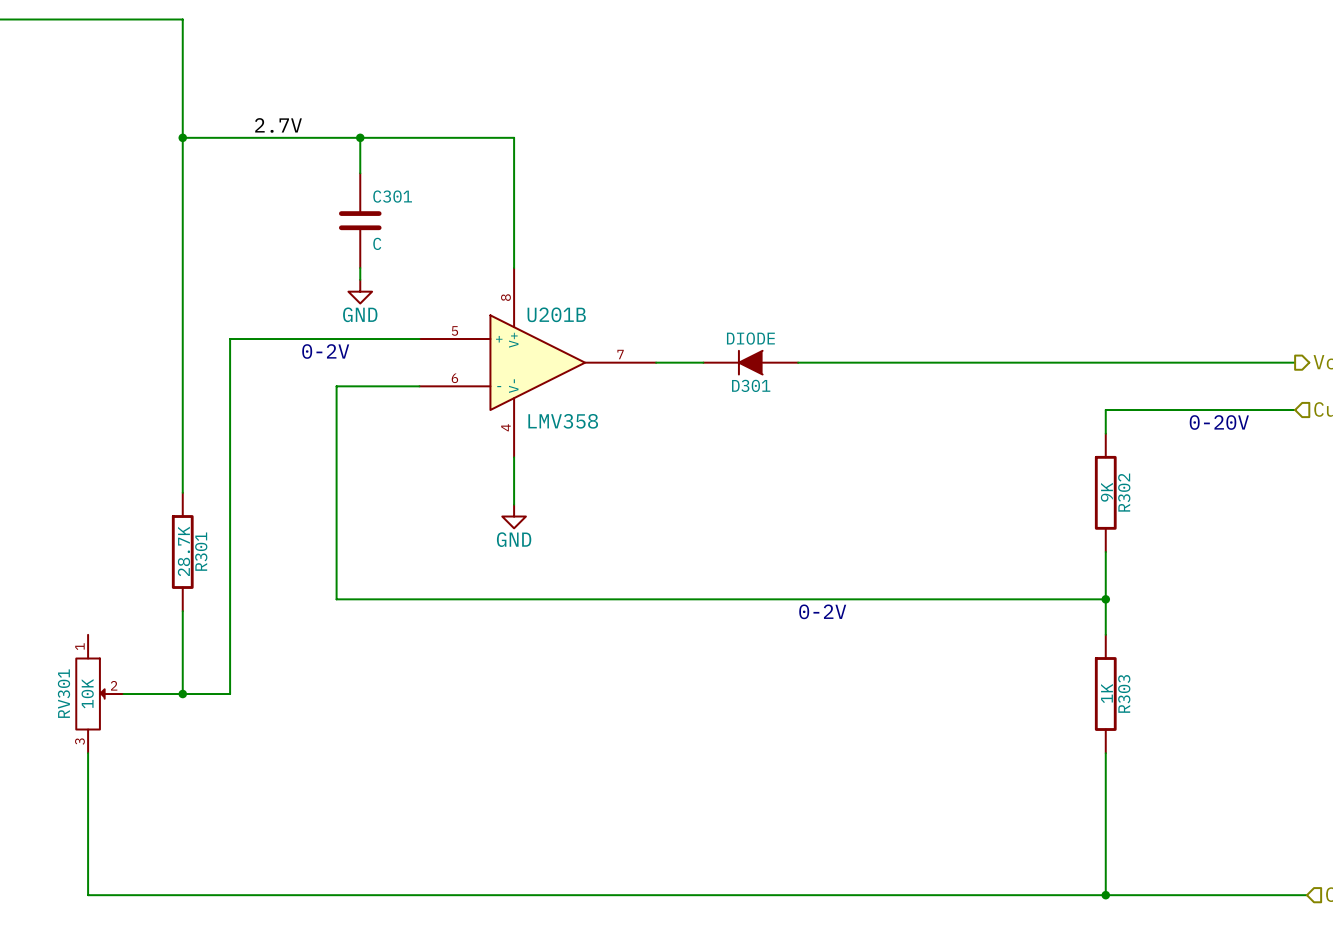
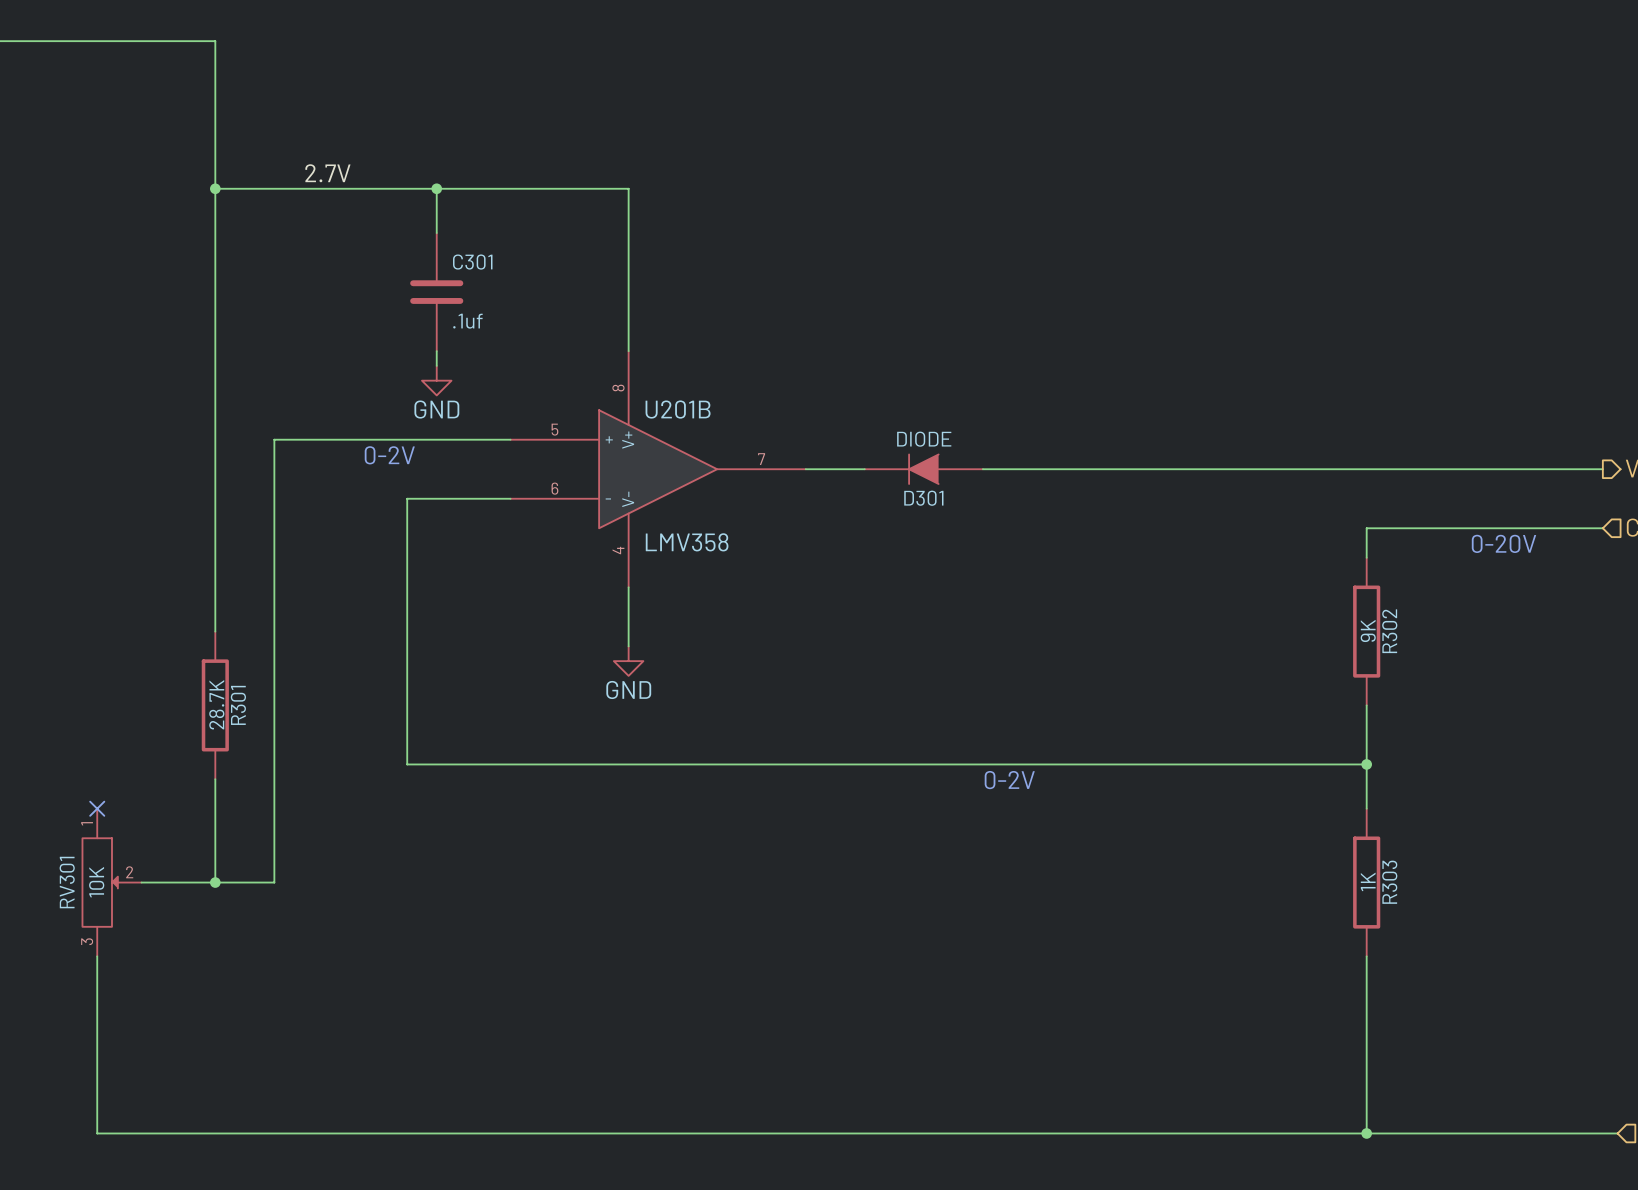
C301 value: C (377, 243) -> .1uf (467, 321)
no-connect mark: none -> (97, 808)

